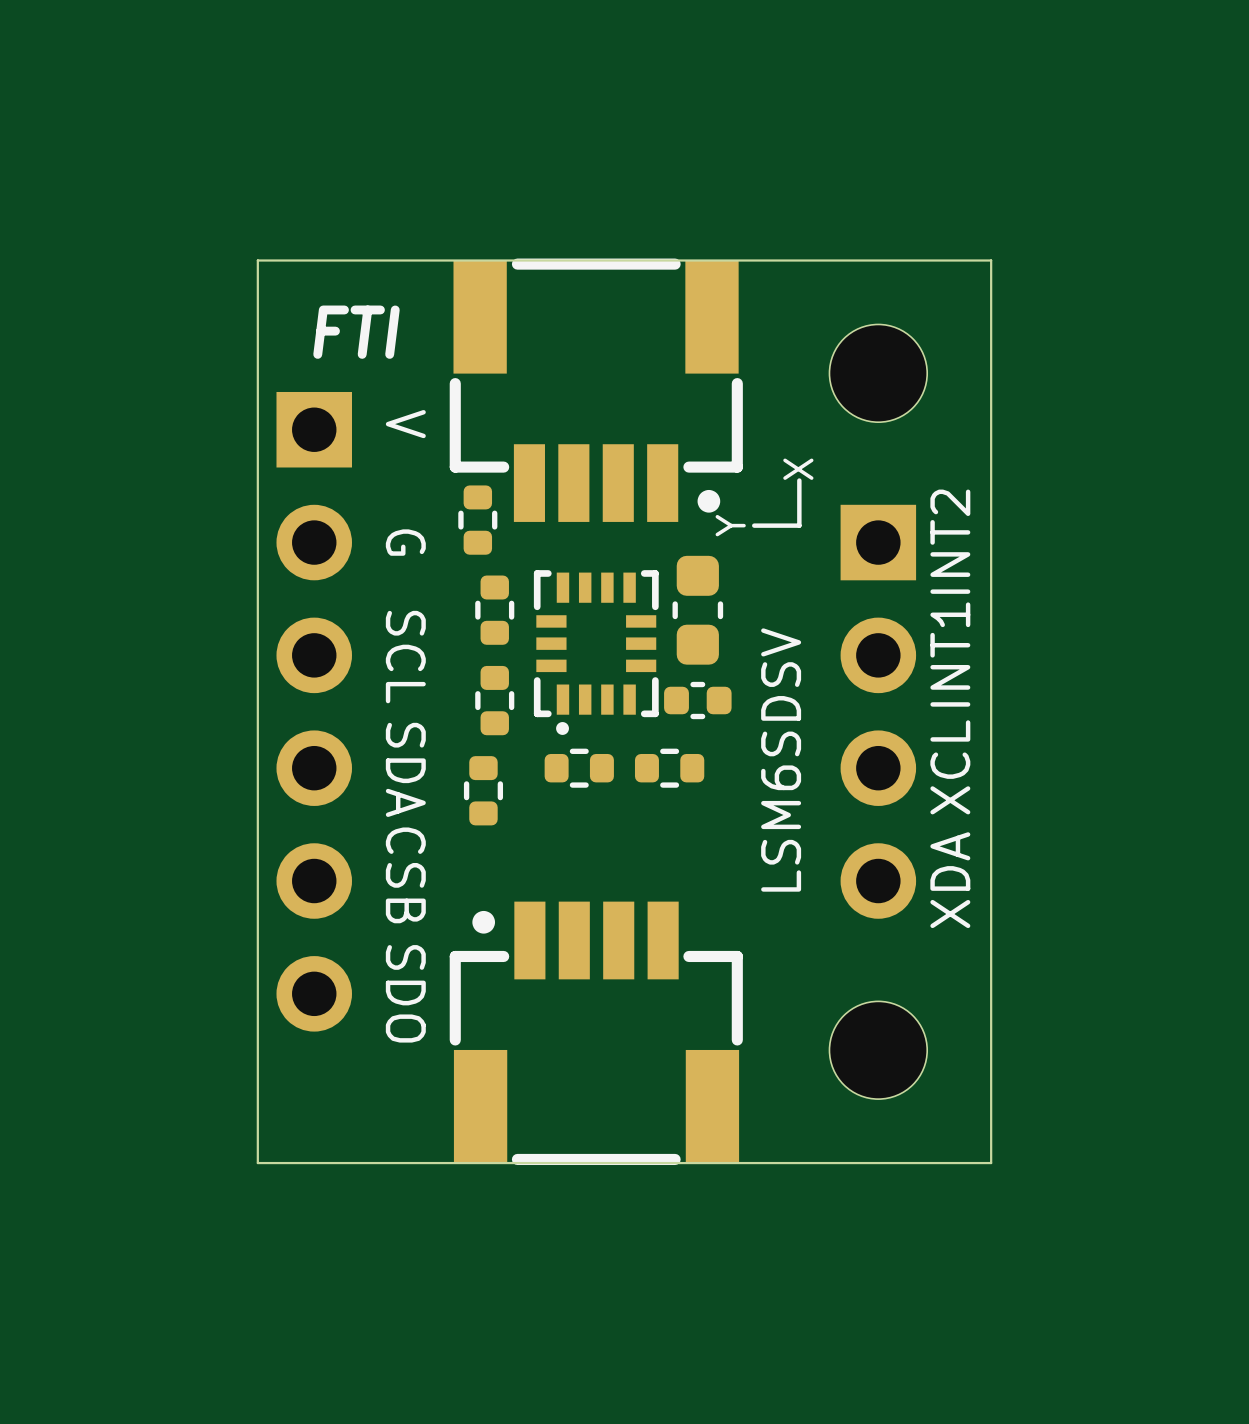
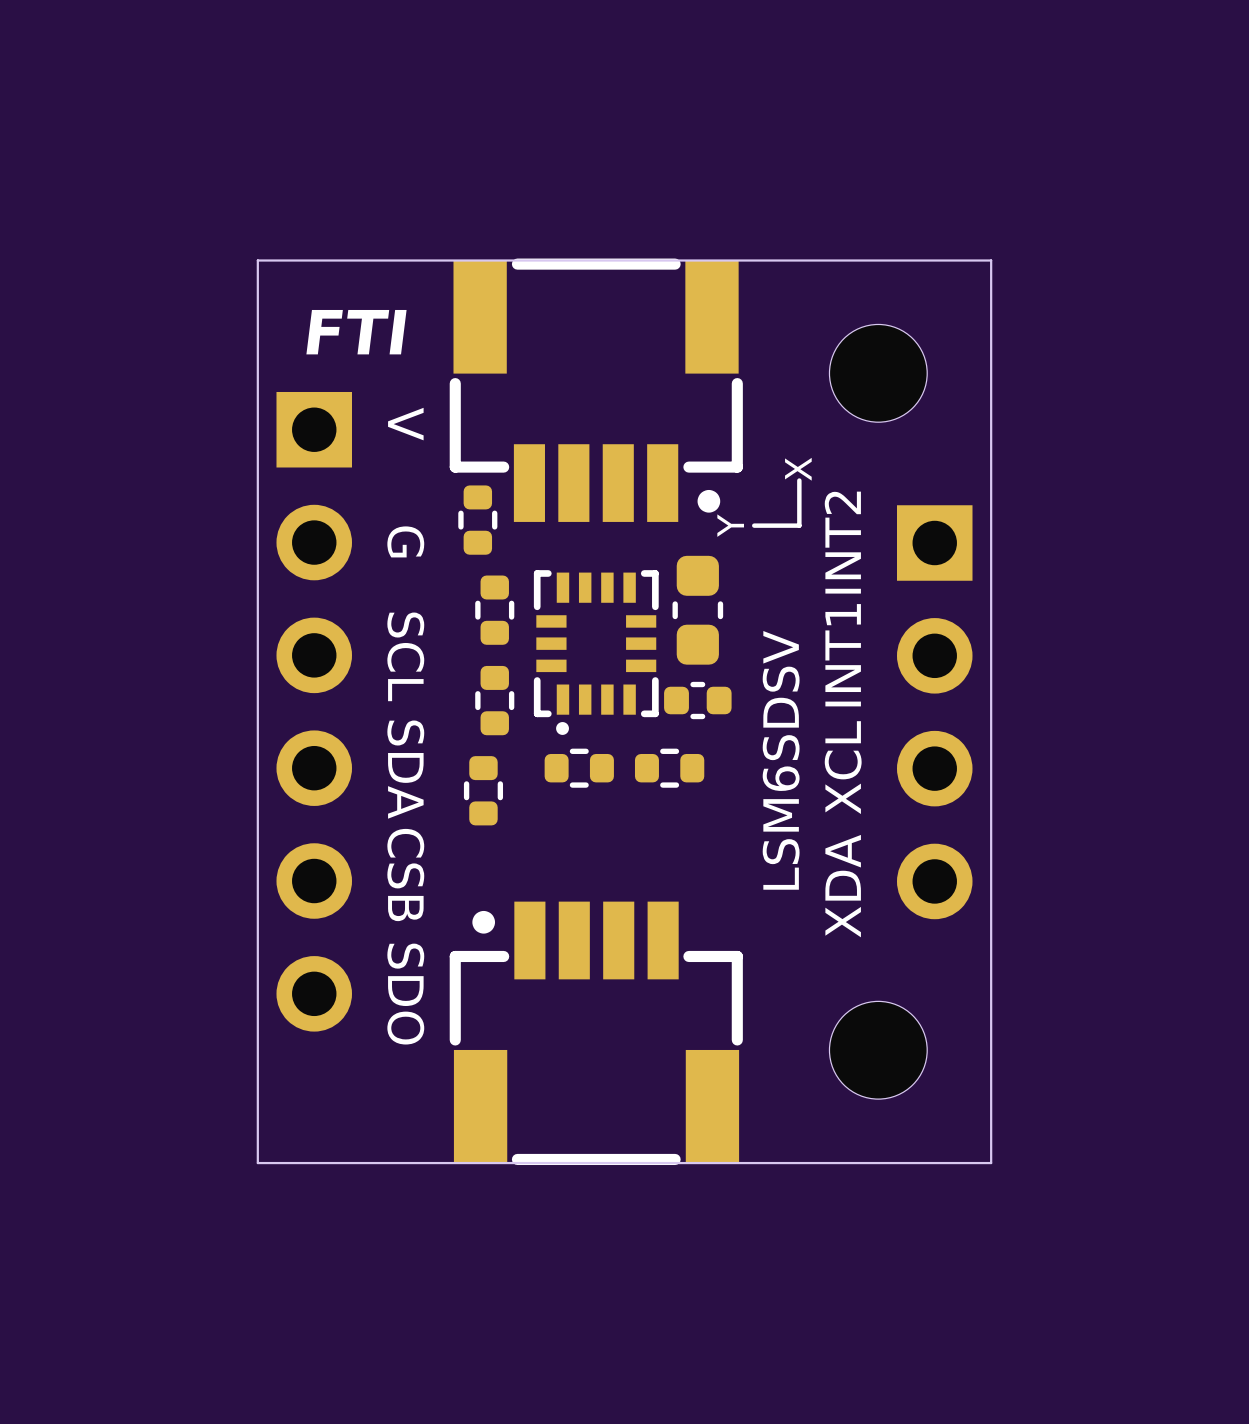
text position: INT2 (950, 541) -> INT2 (842, 542)
text position: INT1 (950, 654) -> INT1 (843, 655)
part position: (878, 711) -> (934, 712)
text position: XCL (950, 767) -> XCL (843, 767)
text position: XDA (950, 880) -> XDA (843, 886)

